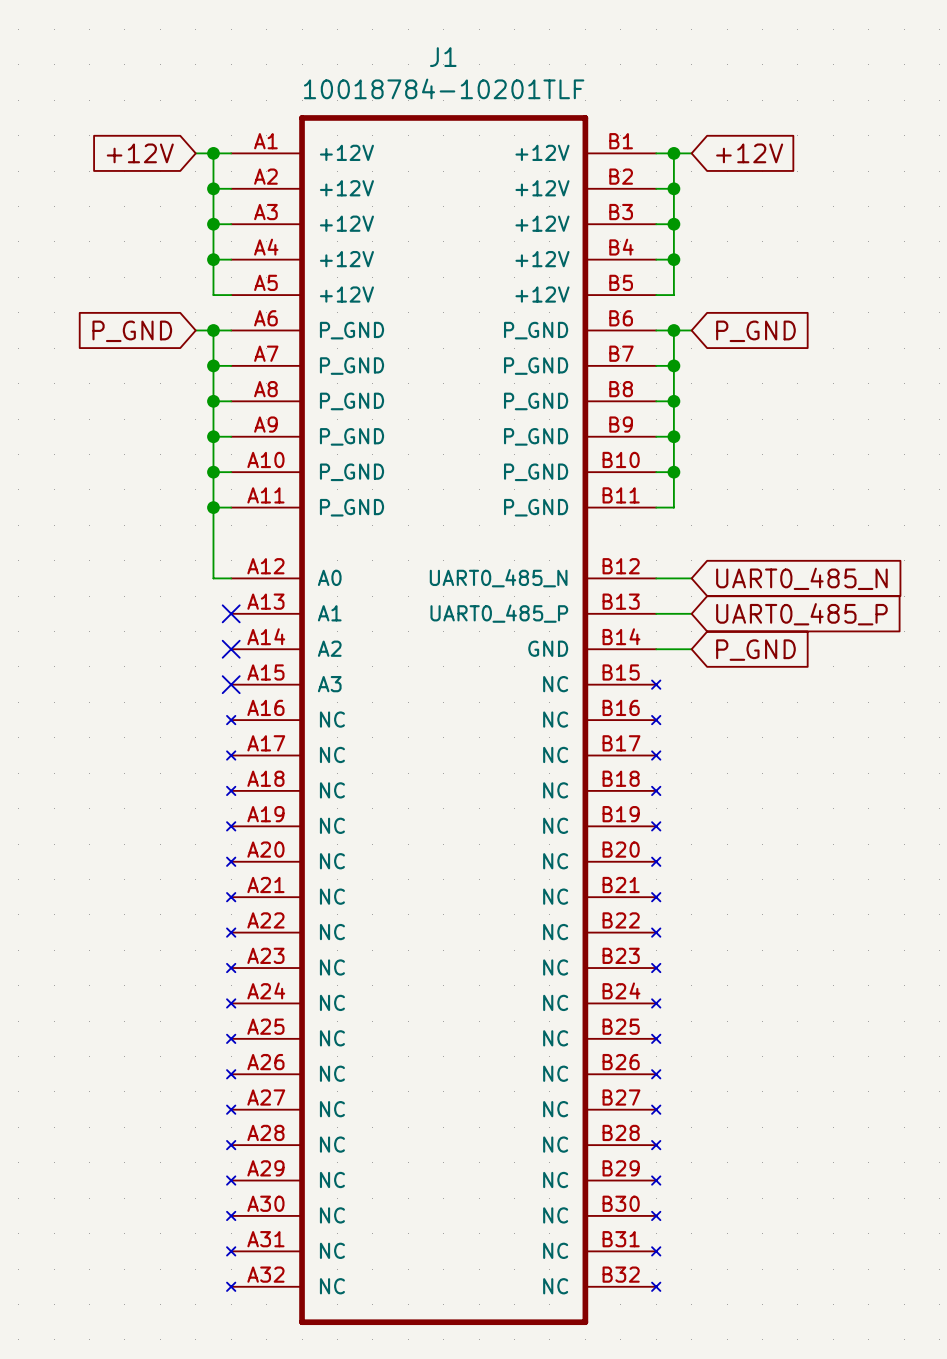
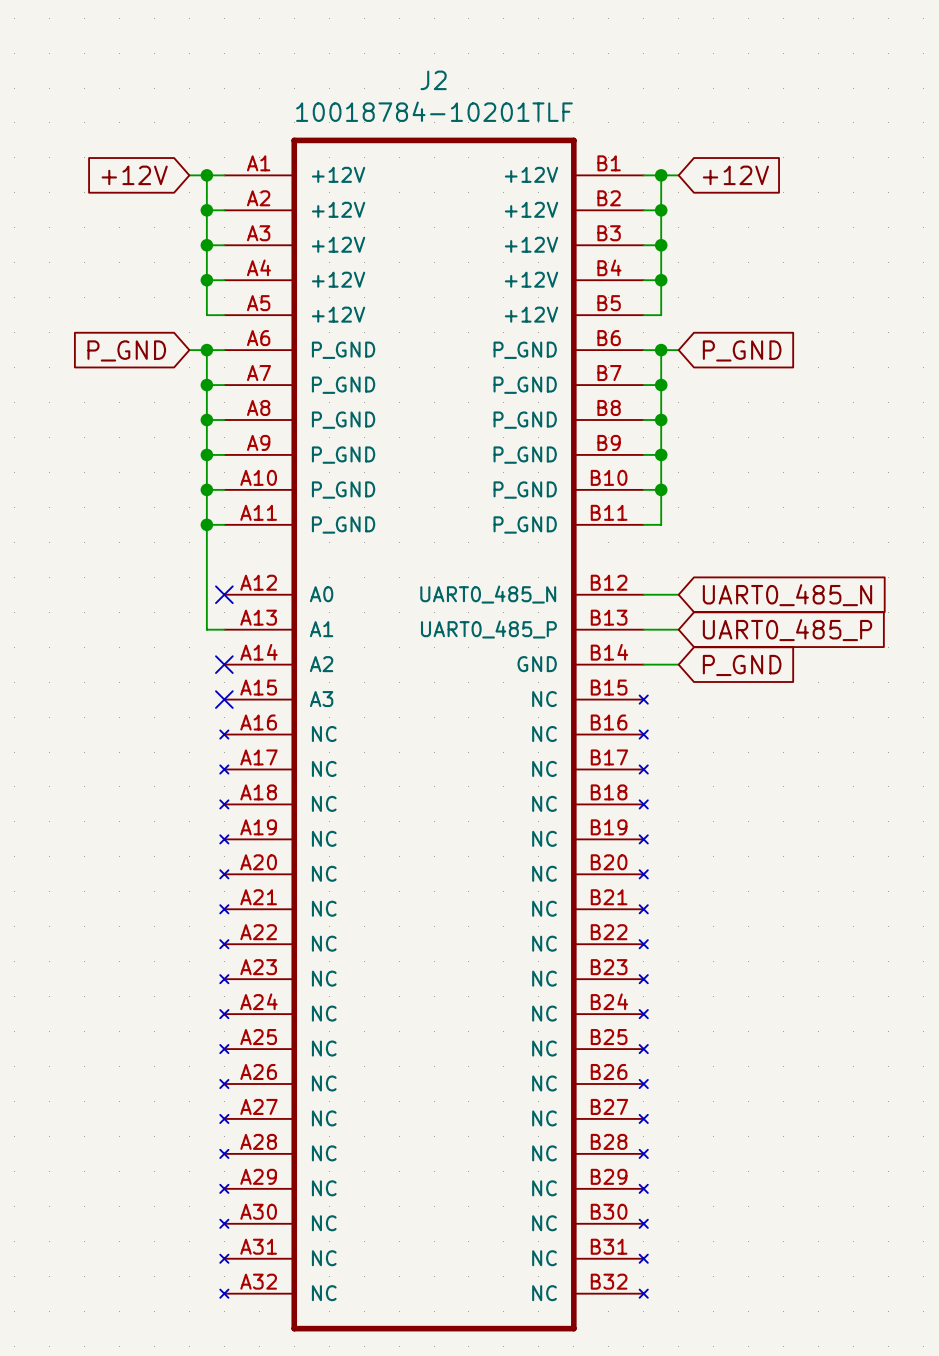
J1 name: J1 (443, 57) -> J2 (433, 80)
wire: (213, 578) (231, 578) -> (206, 594) (206, 629) (224, 629)
no-connect mark position: (231, 613) -> (224, 594)

